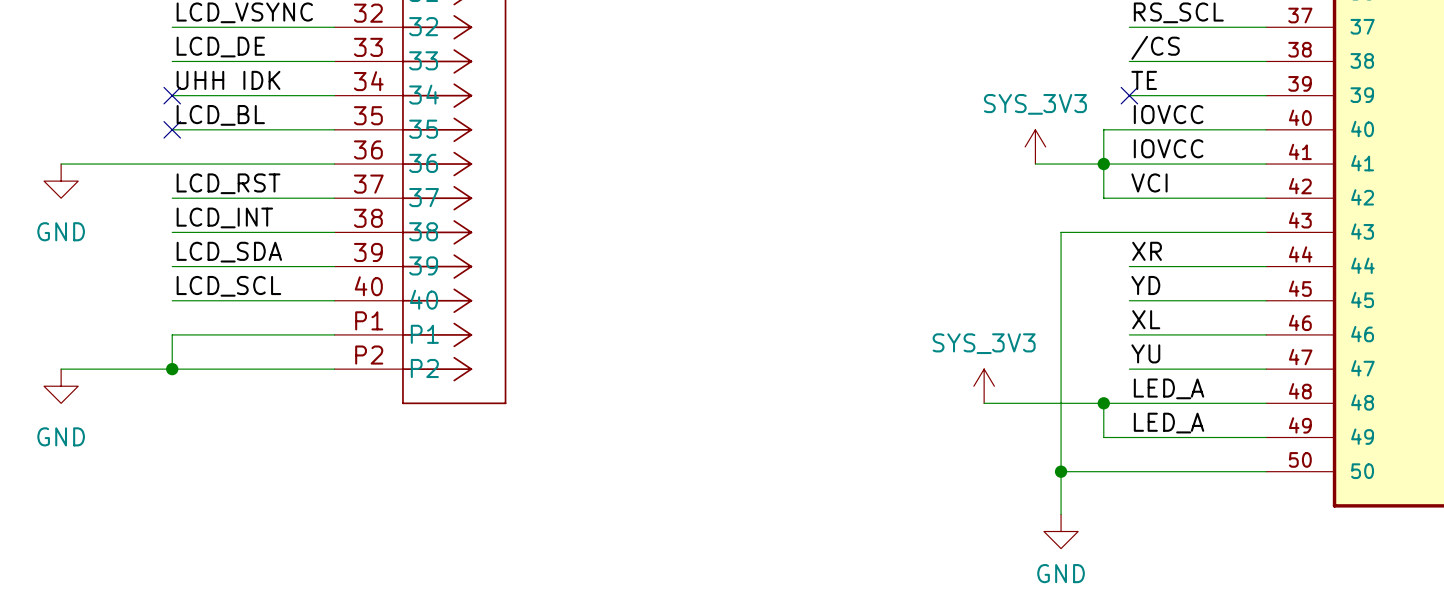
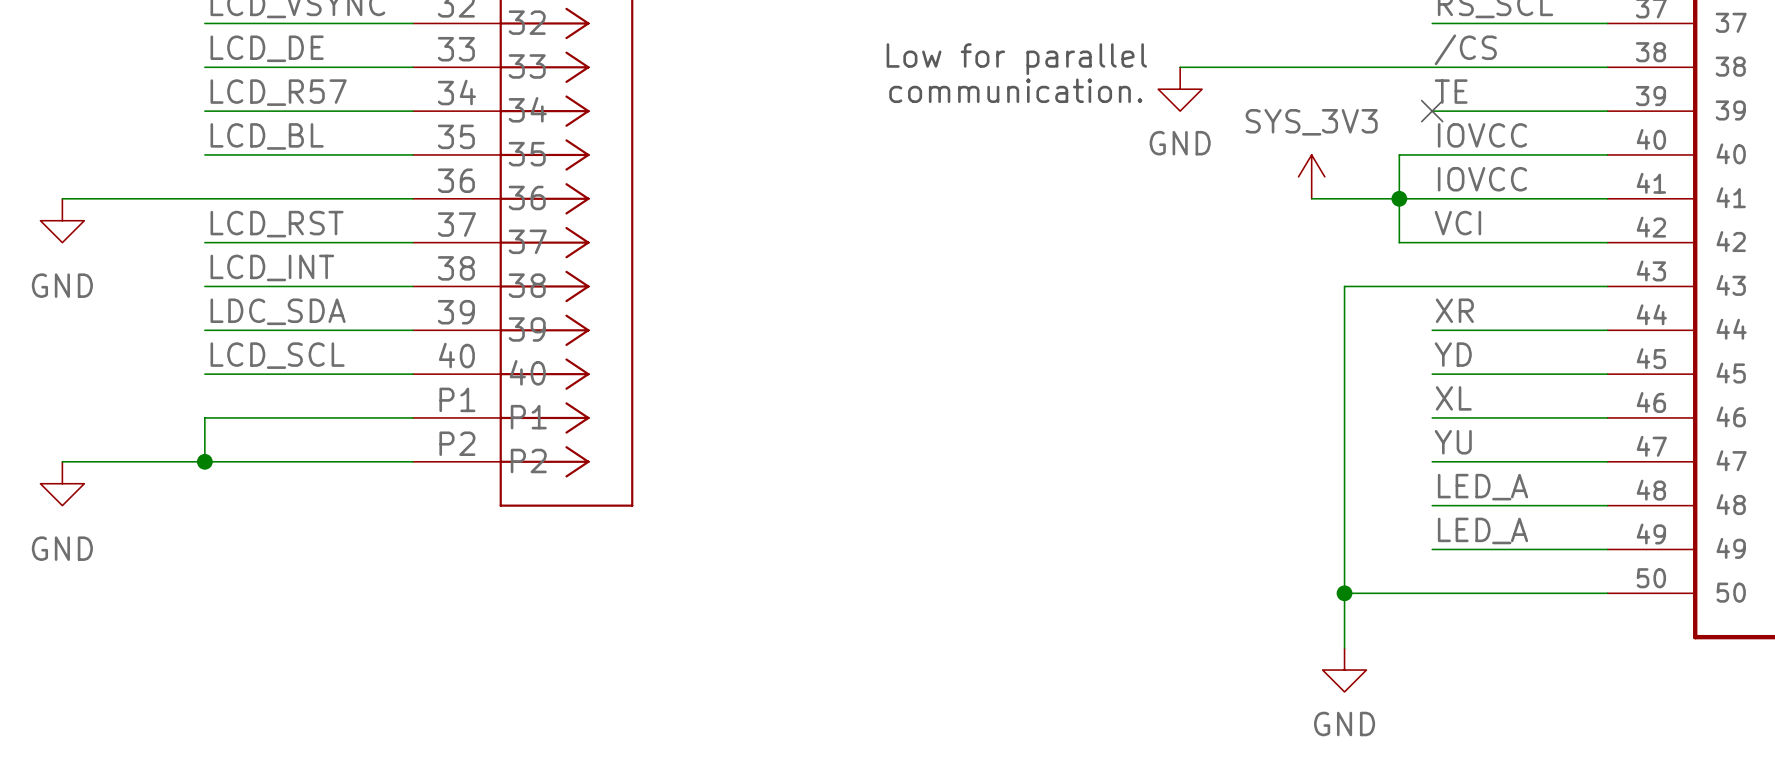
text: none -> Low for parallel (1016, 59)
wire: none -> (1180, 67) (1432, 67)
power symbol: none -> GND (1180, 89)
text: none -> communication. (1015, 90)
label: UHH IDK (228, 80) -> LCD_R57 (278, 92)
no-connect mark: (172, 95) -> none
no-connect mark: (172, 129) -> none
label: LCD_SDA (229, 252) -> LDC_SDA (278, 311)
power symbol: SYS_3V3 (984, 386) -> none
wire: (984, 403) (1129, 403) -> none
wire: (1103, 403) (1103, 437) (1129, 437) -> none
junction: (1103, 403) -> none

